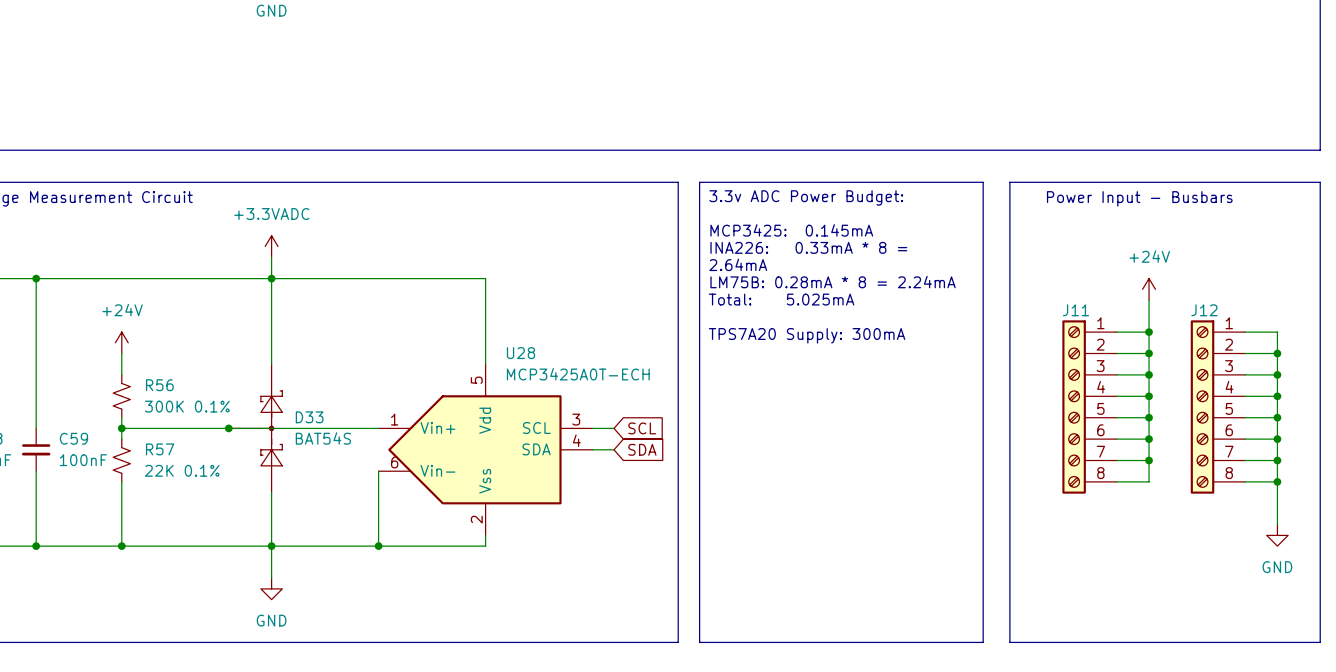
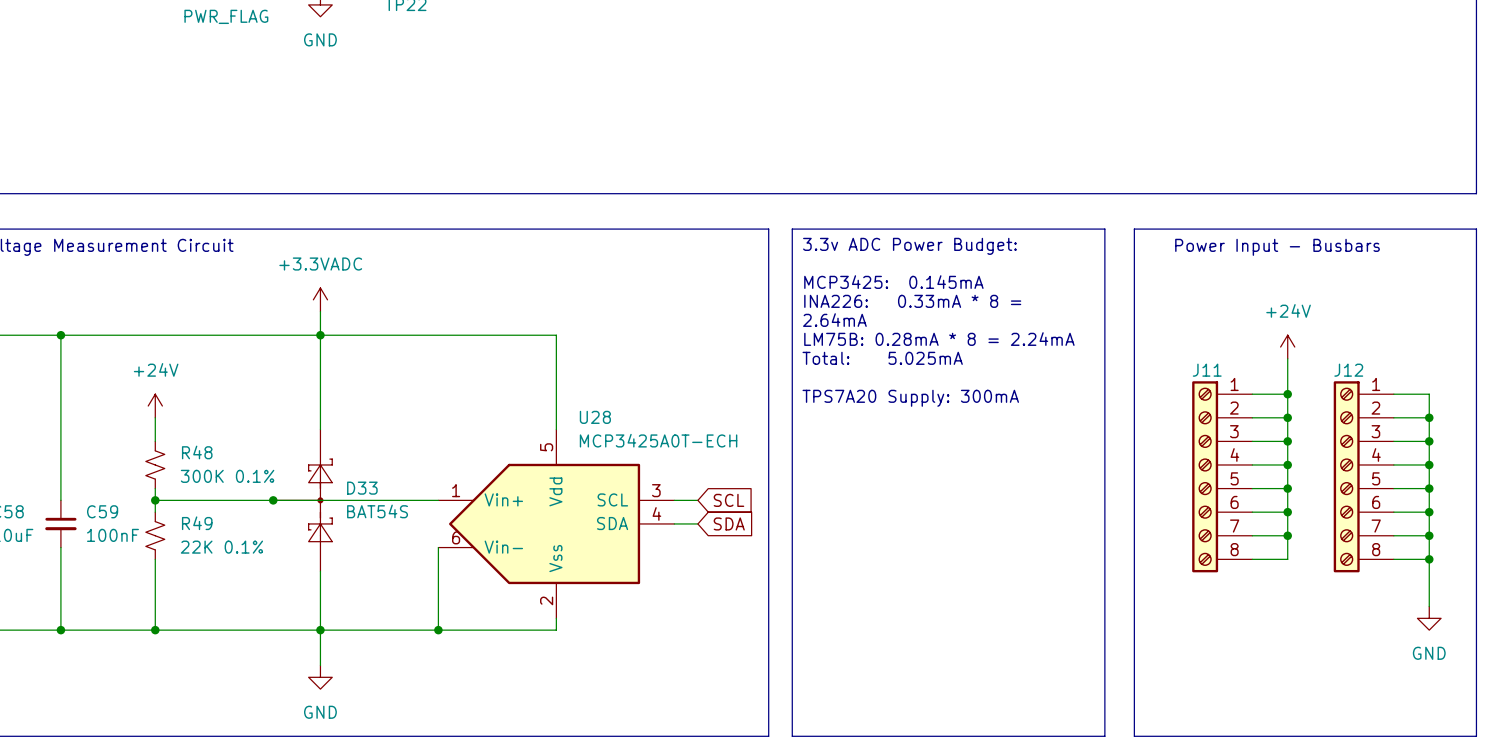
R56 name: R56 (159, 385) -> R48 (197, 452)
R57 name: R57 (160, 449) -> R49 (197, 523)

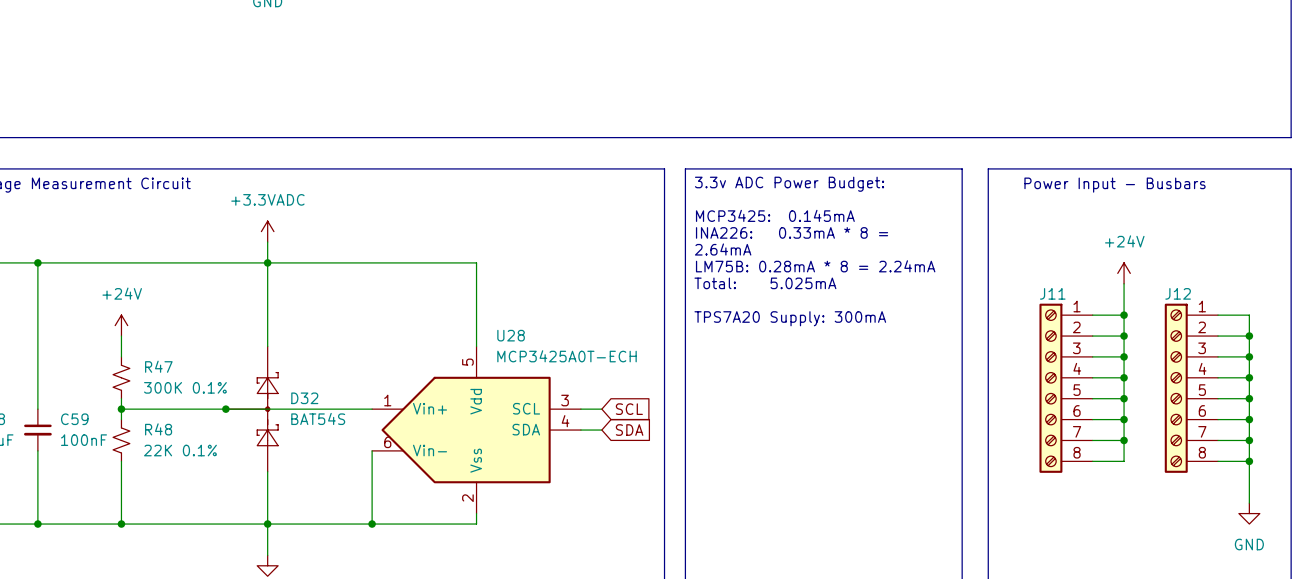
R48 name: R48 (197, 452) -> R47 (158, 366)
D33 name: D33 (362, 488) -> D32 (304, 398)
R49 name: R49 (197, 523) -> R48 (158, 429)

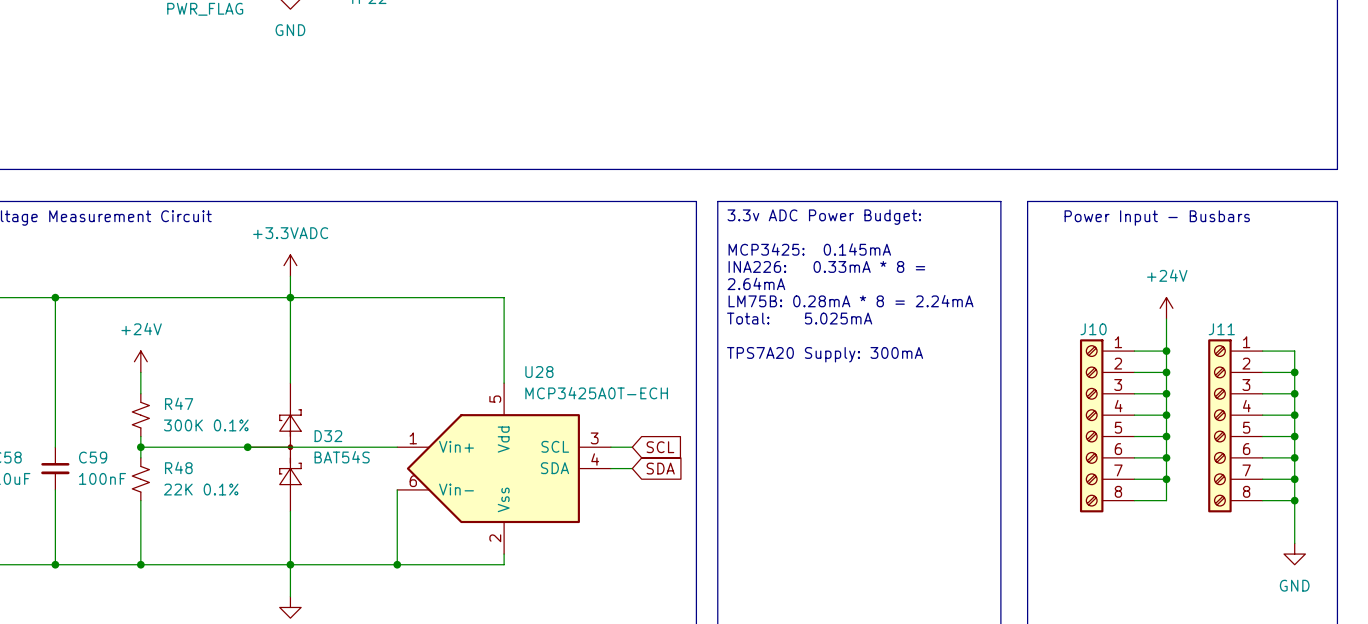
J11 name: J11 (1052, 293) -> J10 (1093, 329)
J12 name: J12 (1178, 293) -> J11 (1221, 329)

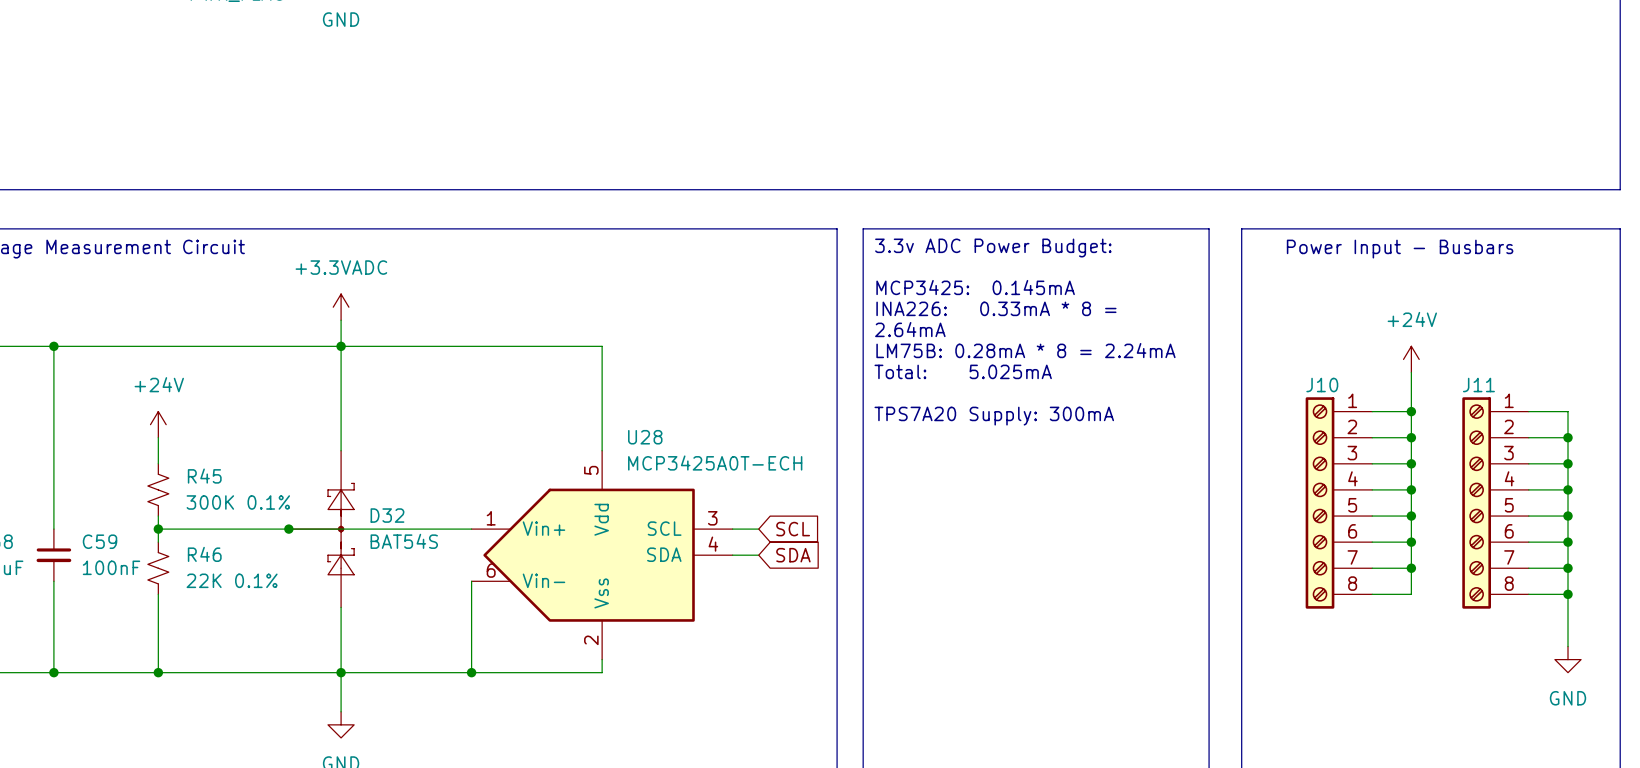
R47 name: R47 (179, 403) -> R45 (204, 476)
R48 name: R48 (178, 467) -> R46 (204, 554)

